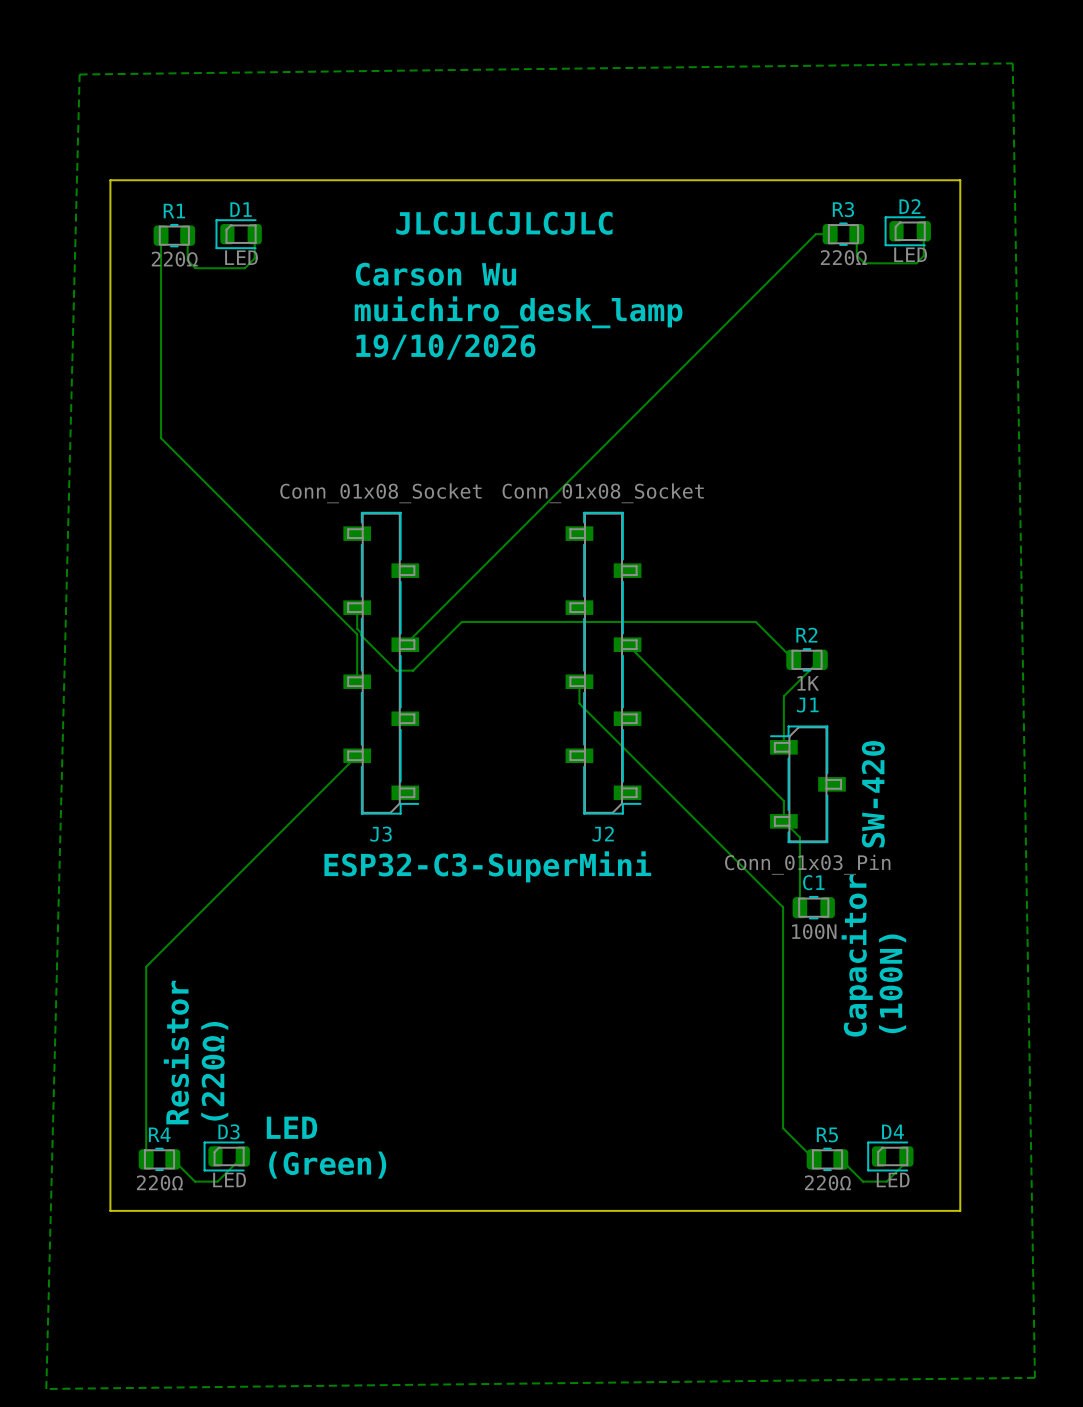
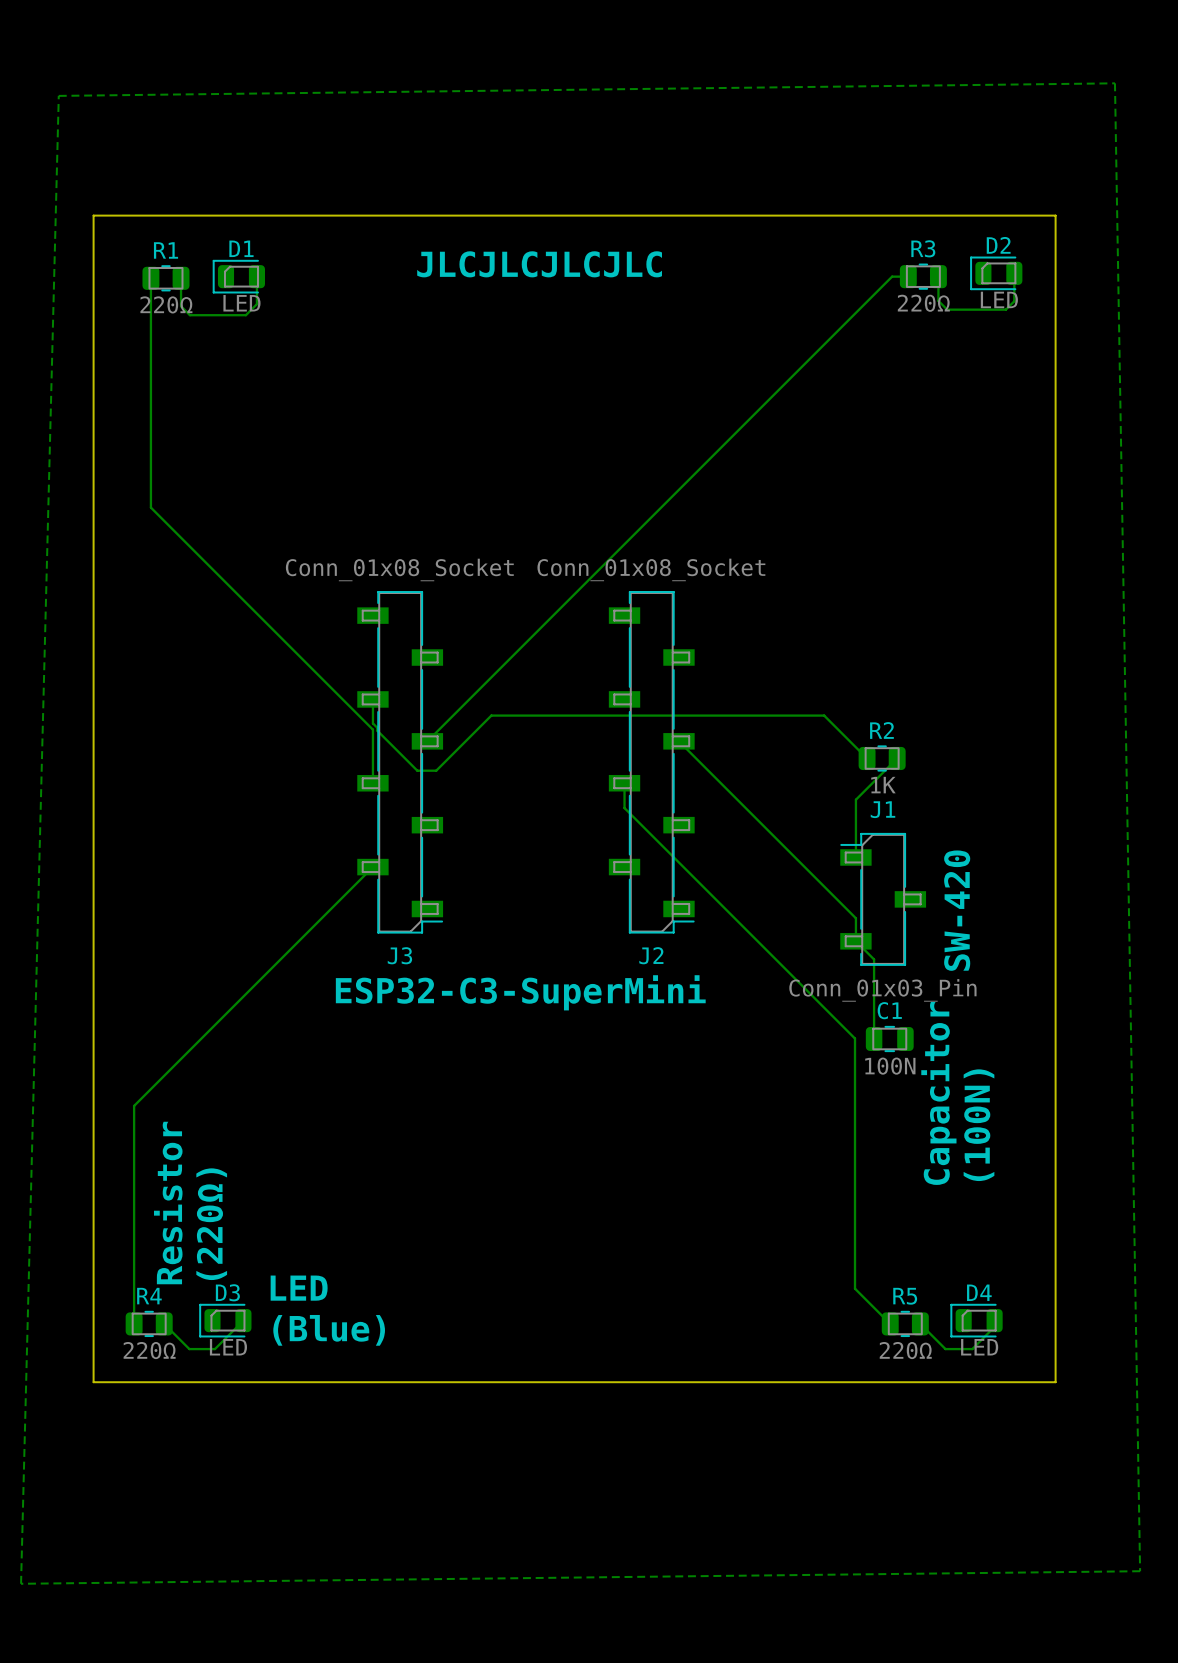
text: Carson Wu (435, 274) -> none
text: muichiro_desk_lamp (518, 312) -> none
text: 19/10/2026 (445, 346) -> none
text: (Green) (327, 1165) -> (Blue) (329, 1330)

